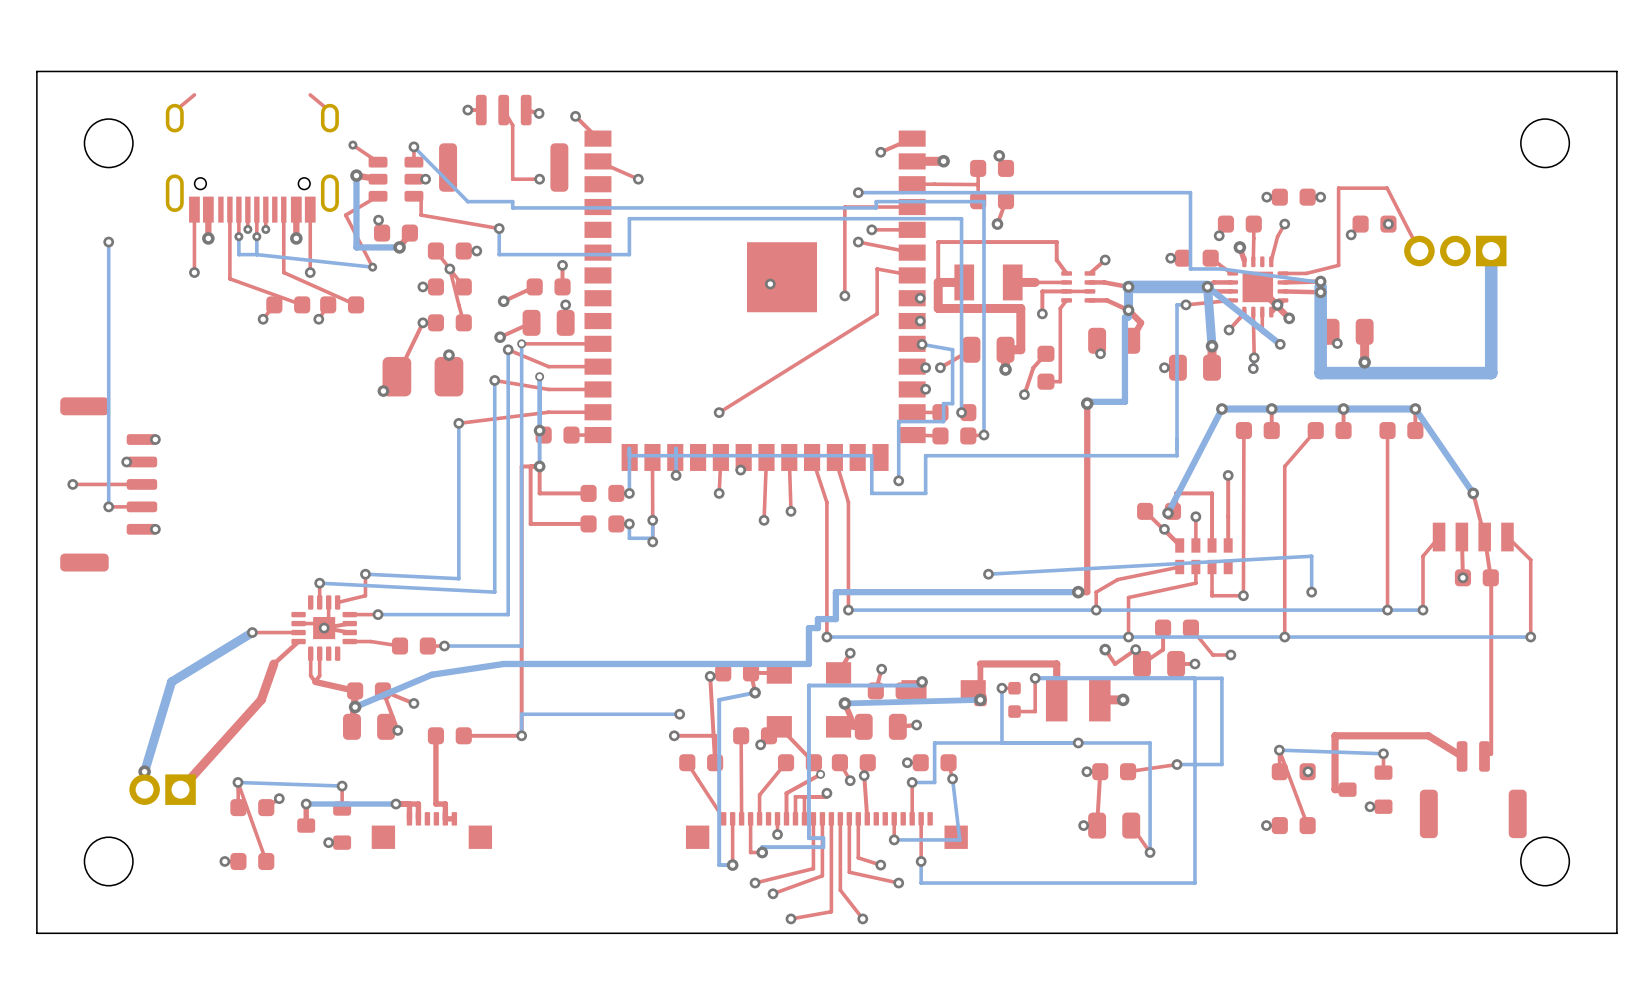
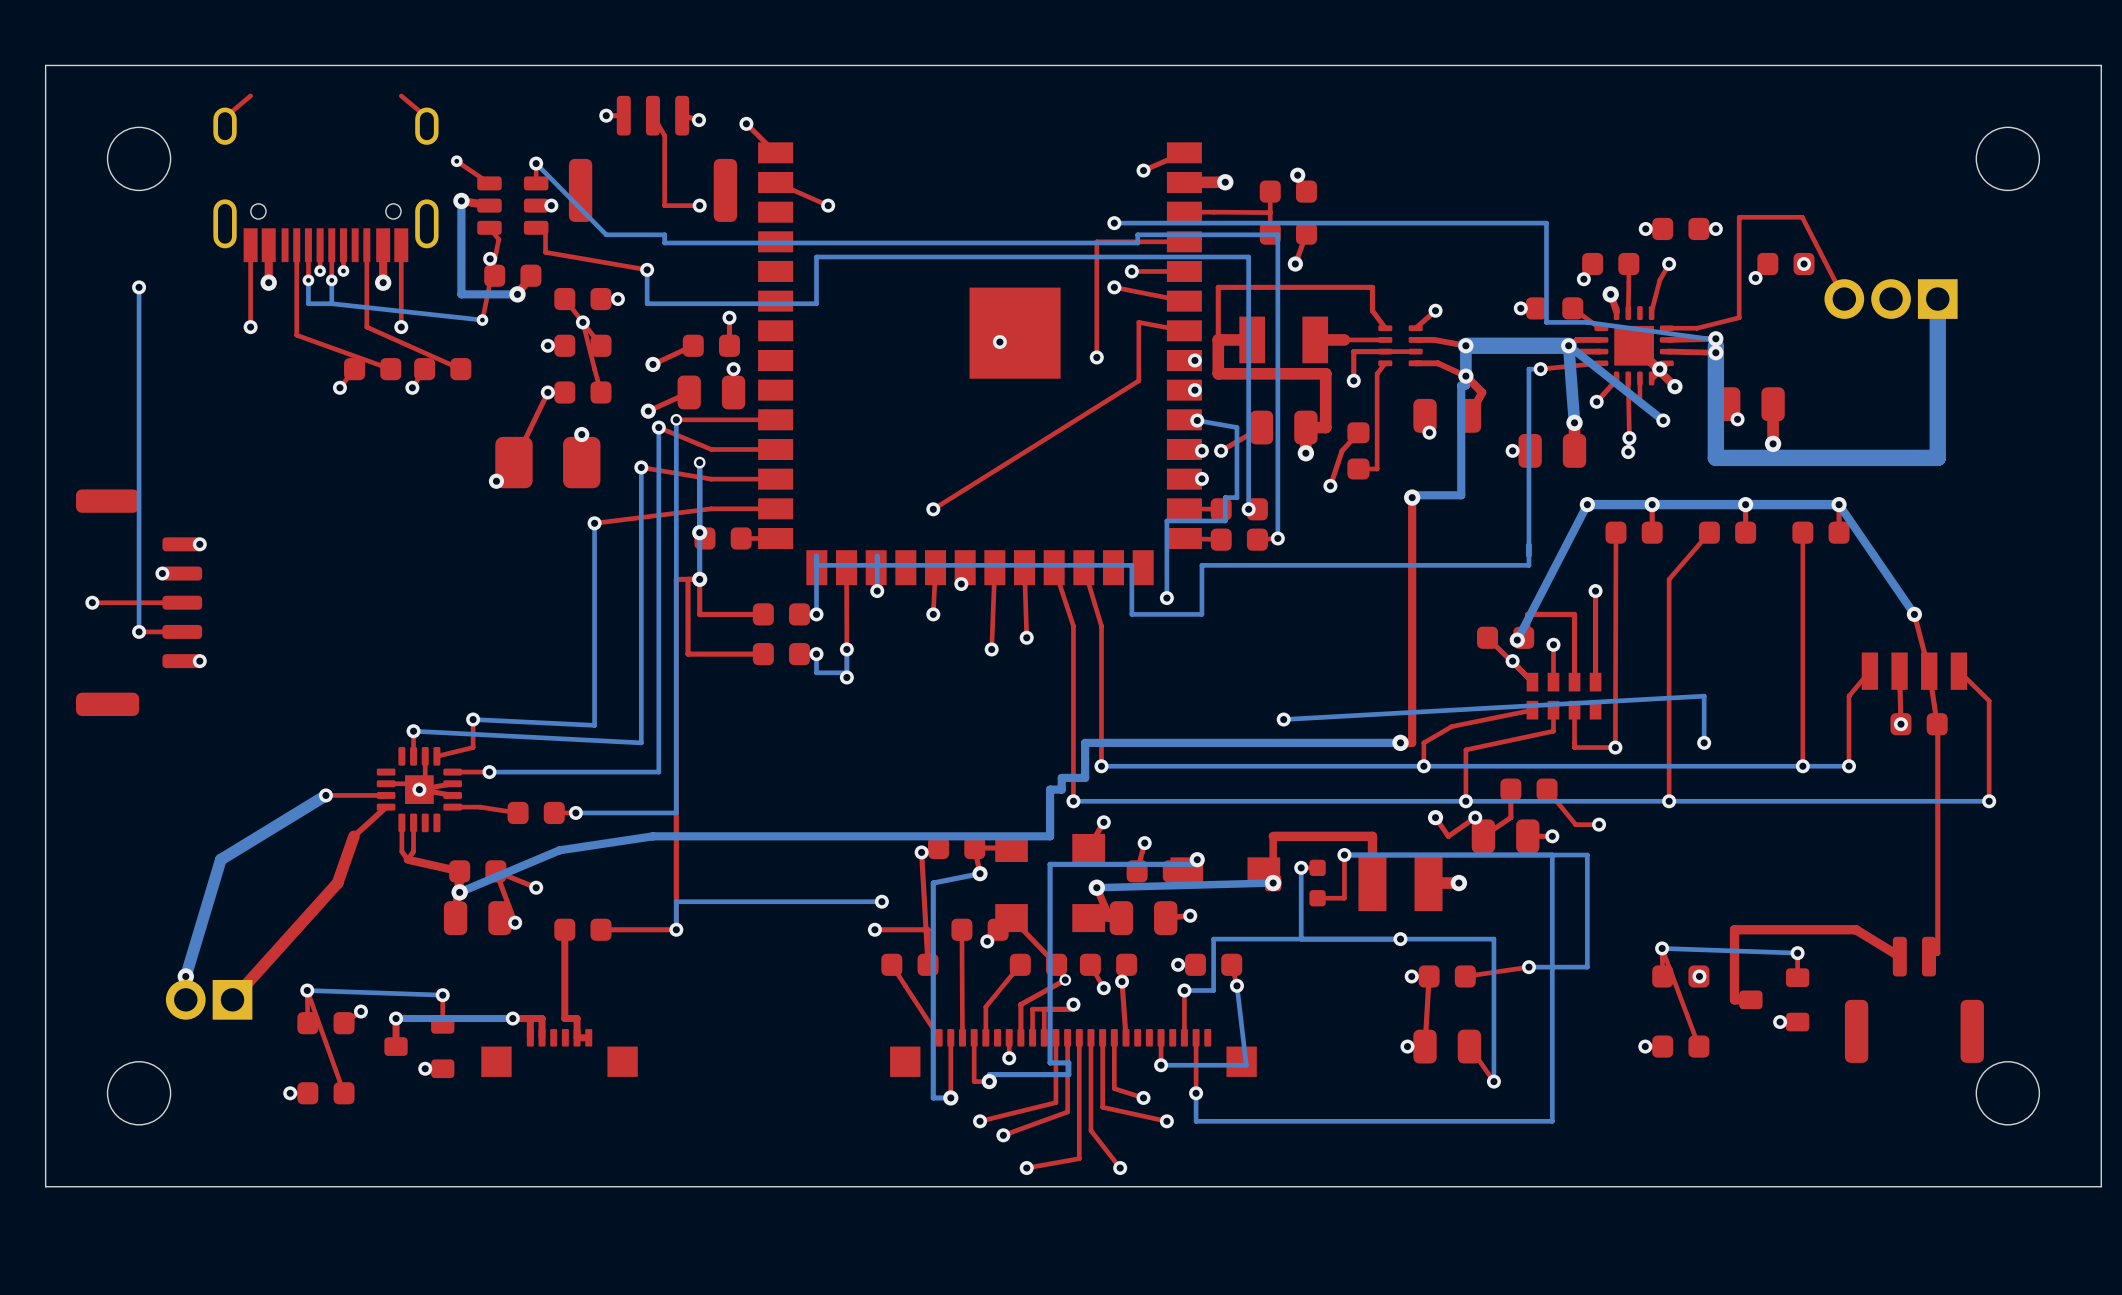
top track: (378, 196) (345, 215) (372, 267) -> (489, 227) (498, 239) (482, 320)

